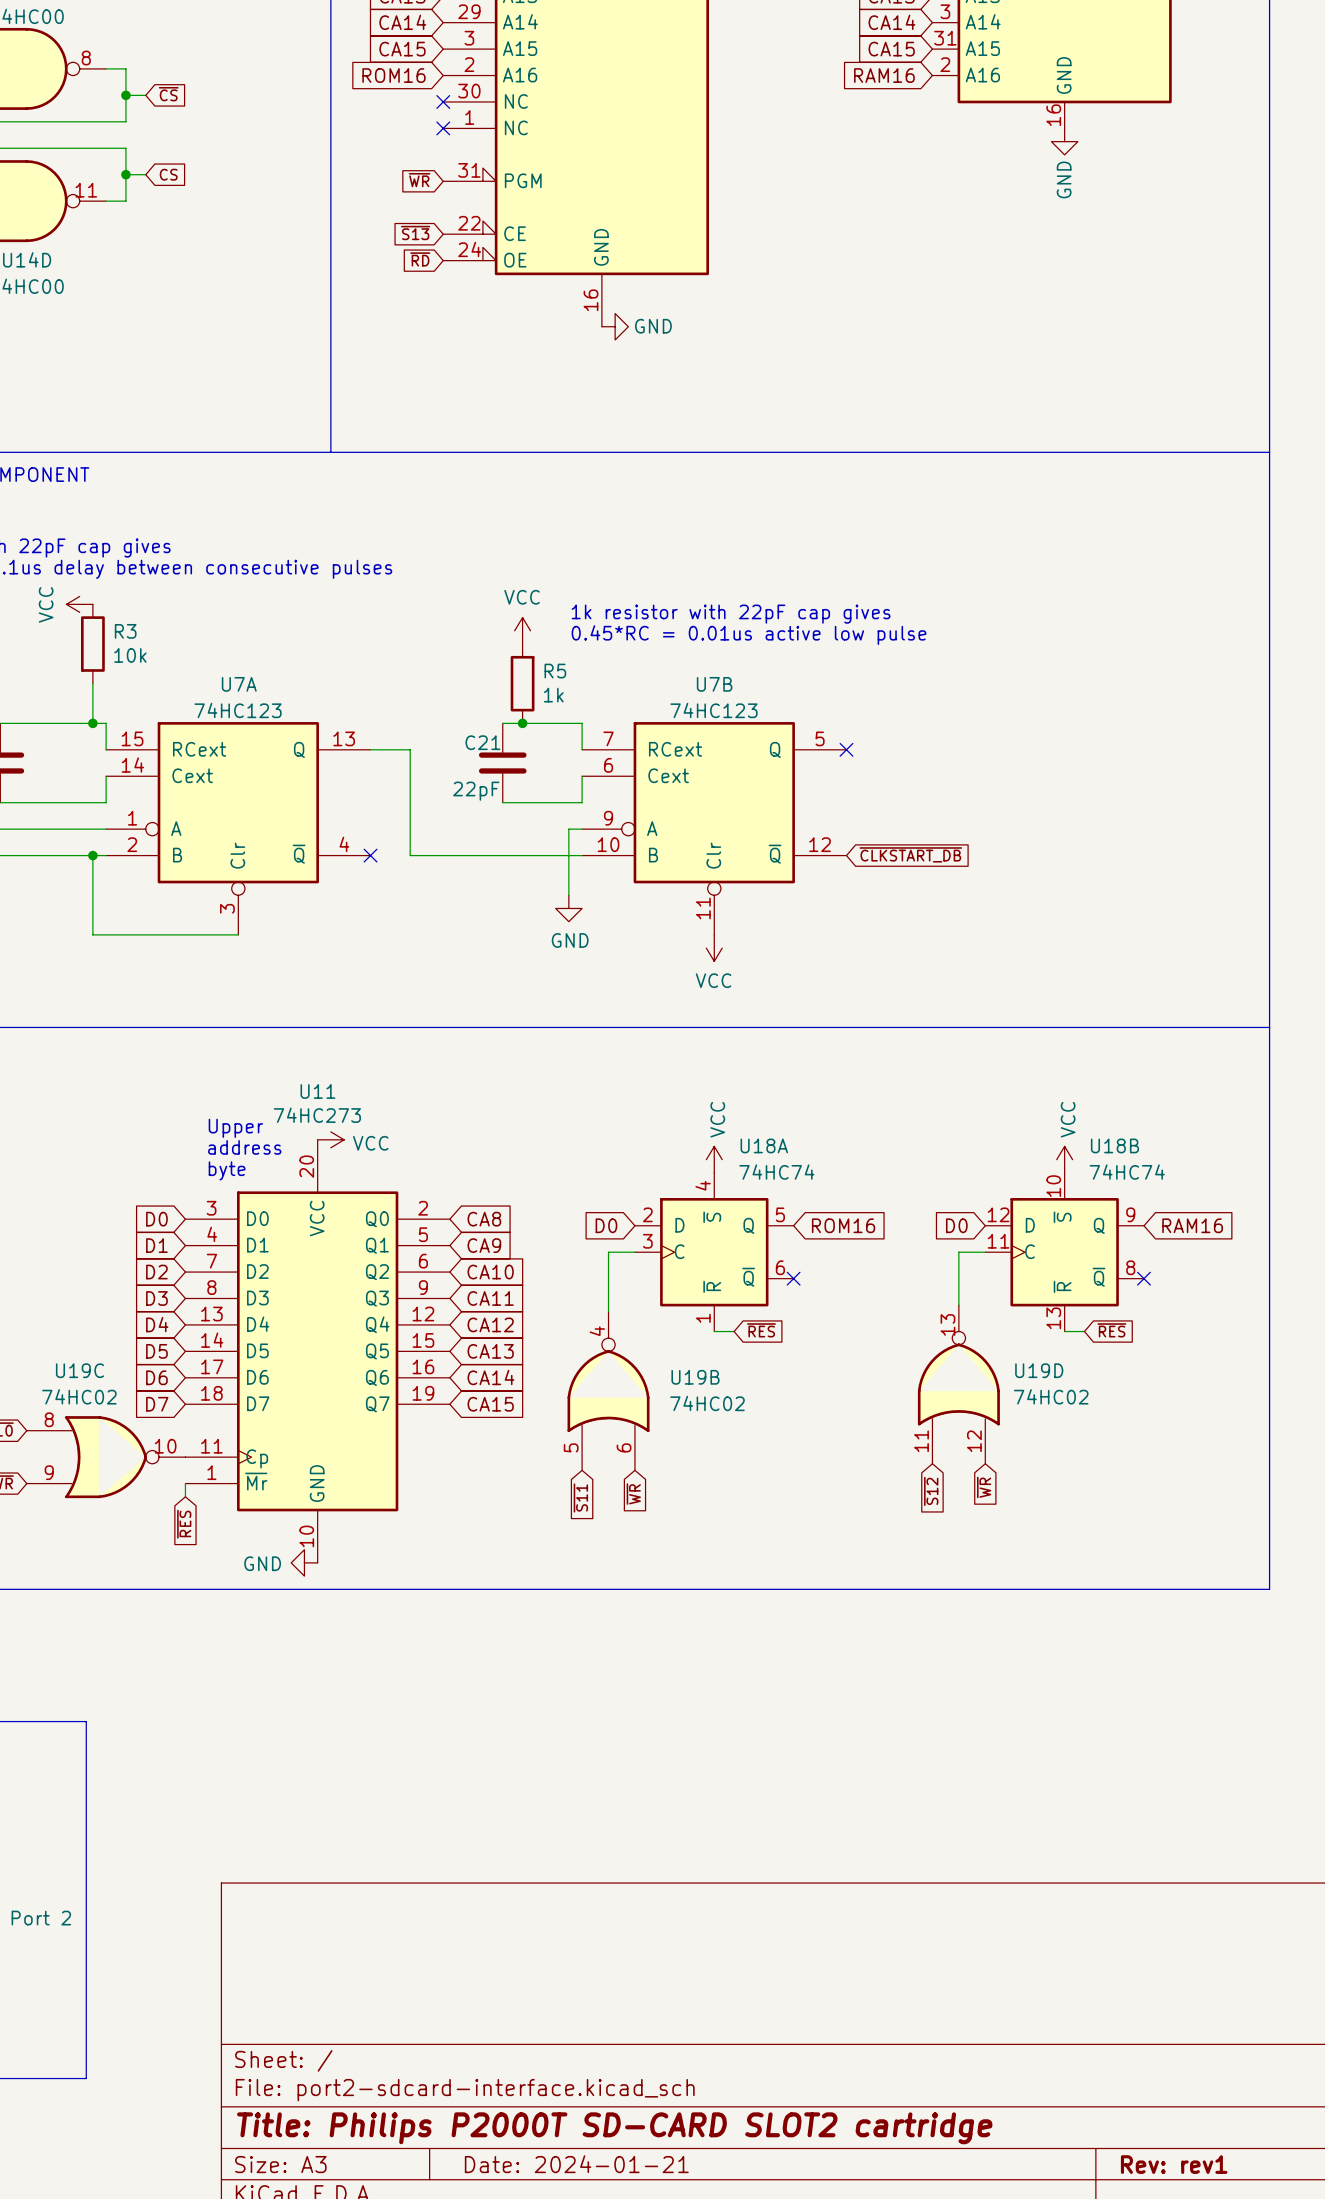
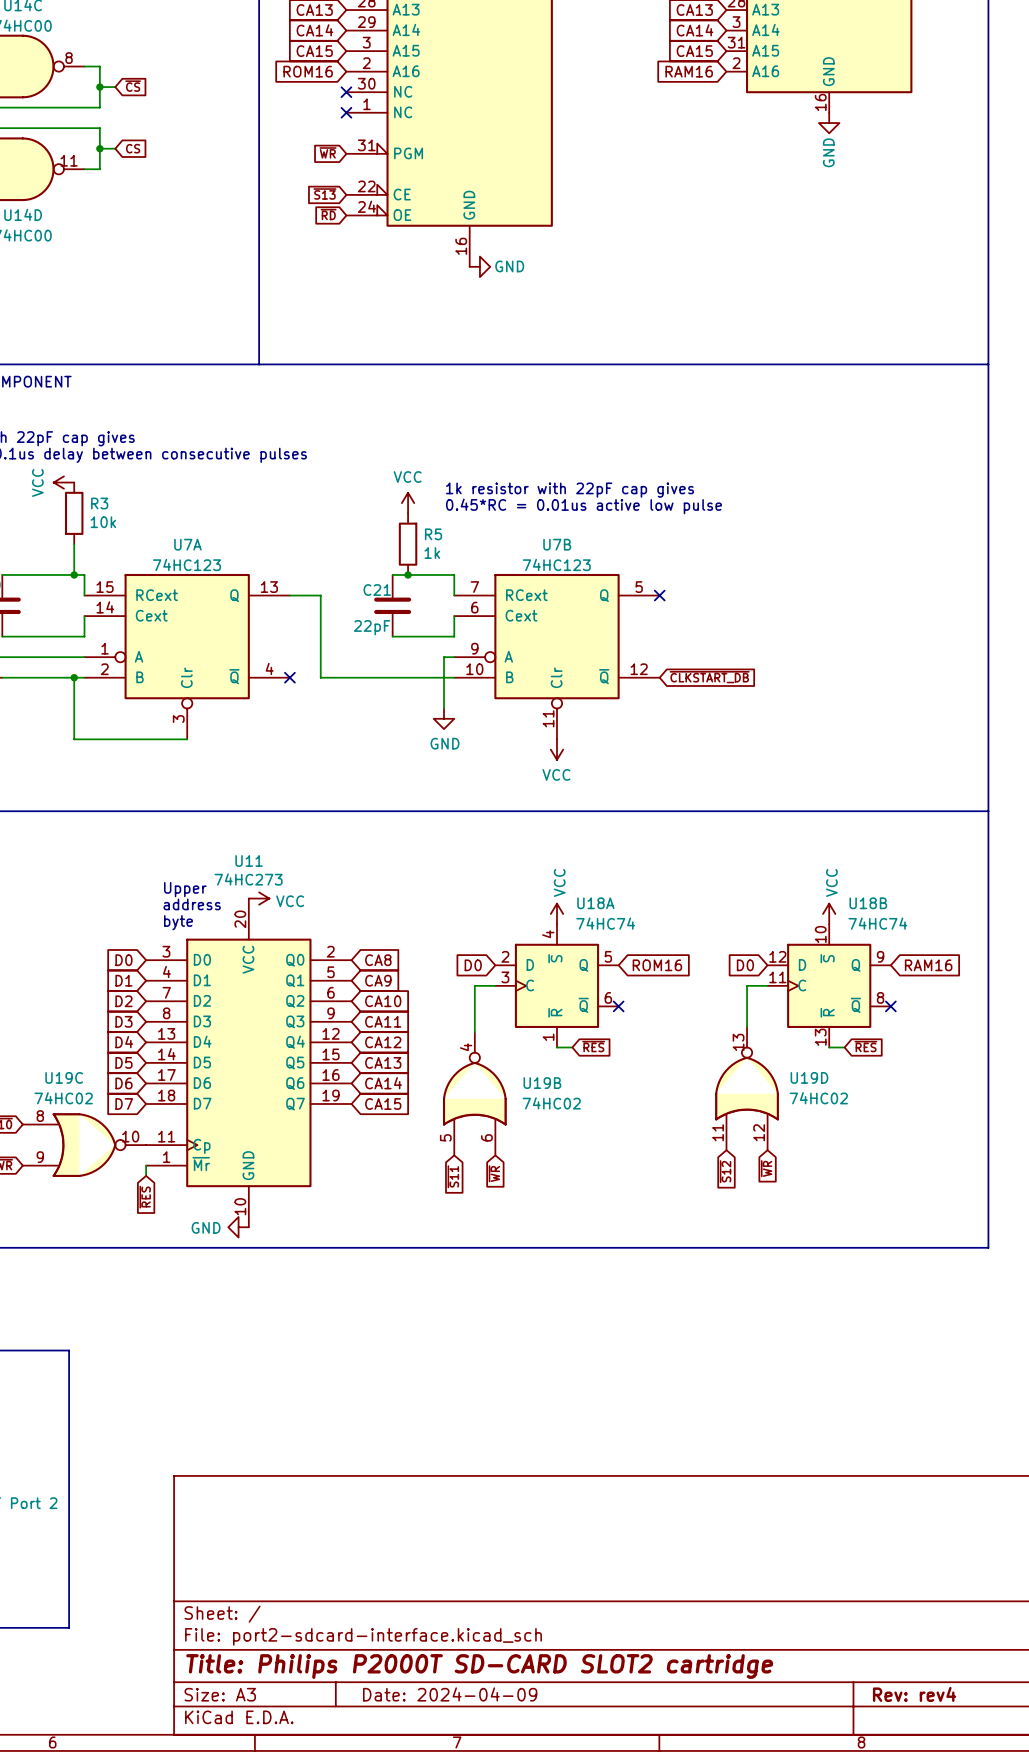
title block: Date: 2024-01-21 (576, 2164) -> Date: 2024-04-09 (450, 1694)
title block: Rev: rev1 (1174, 2164) -> Rev: rev4 (914, 1694)

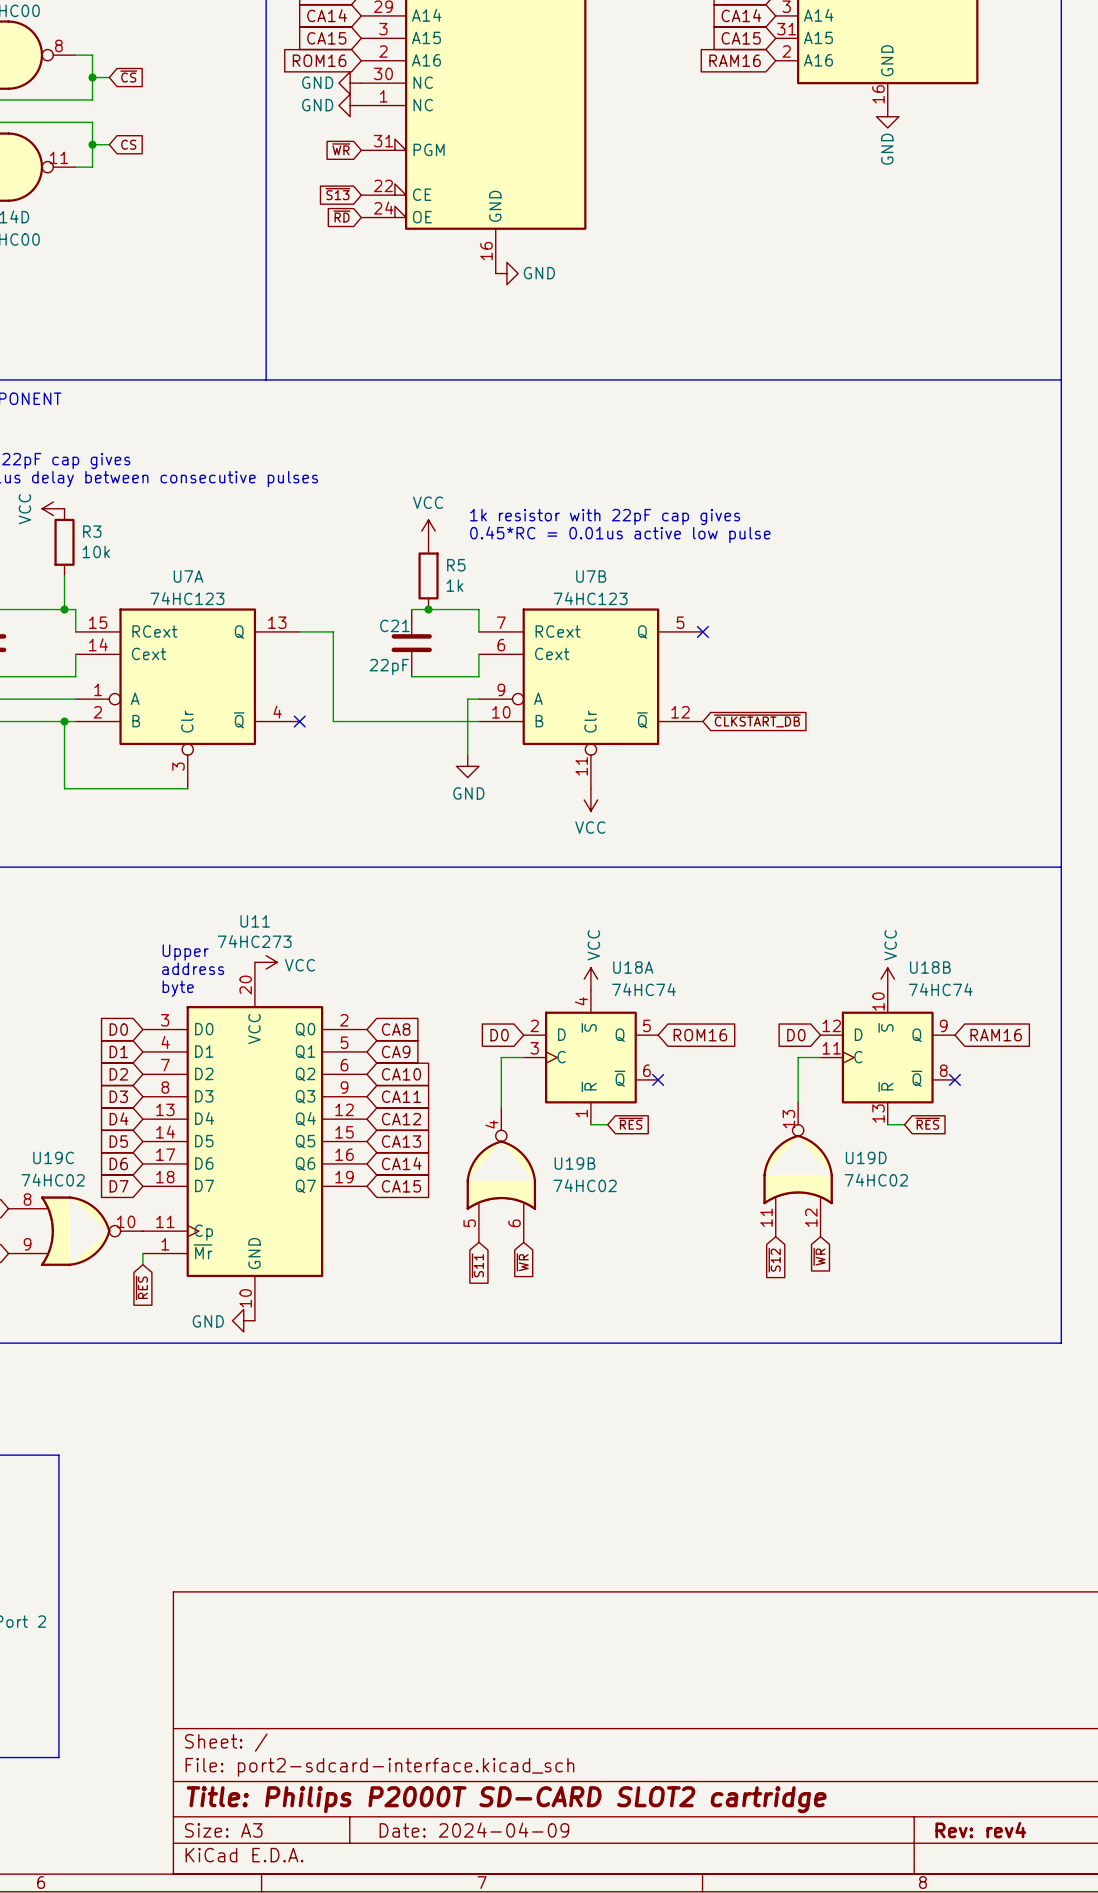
power symbol: none -> GND (350, 83)
no-connect mark: (346, 92) -> none
power symbol: none -> GND (350, 105)
no-connect mark: (346, 112) -> none

